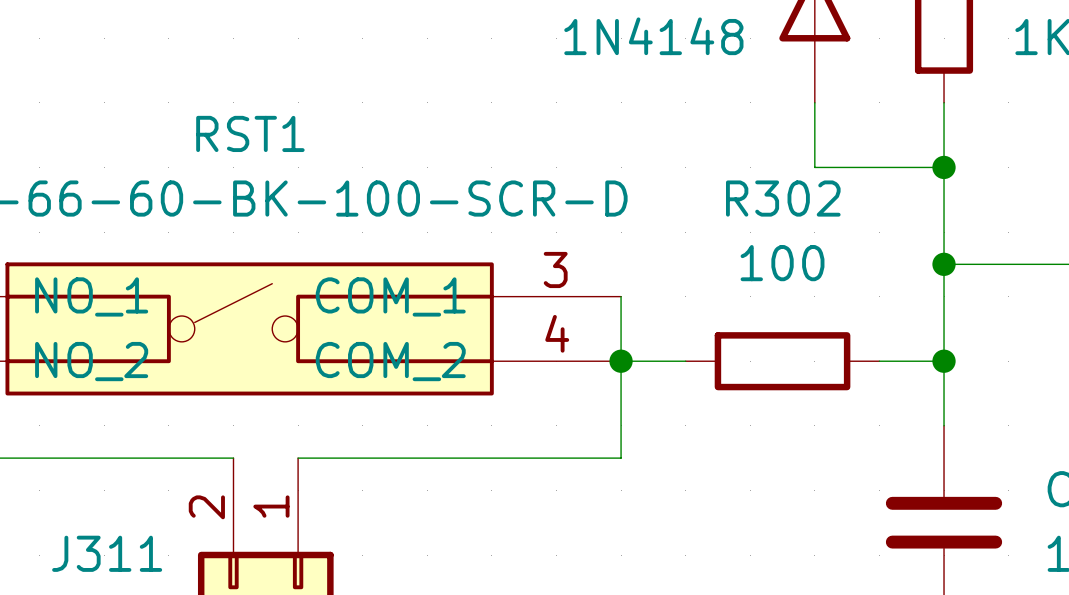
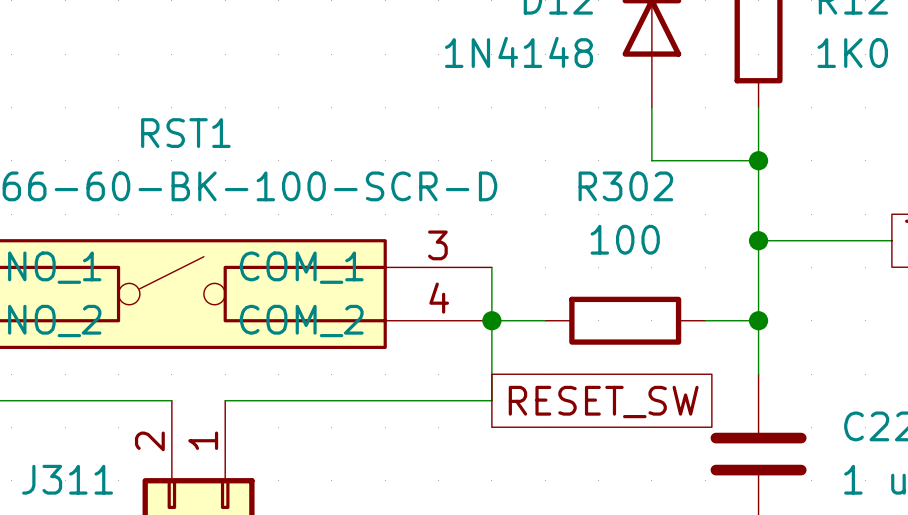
global label: none -> RESET_SW (603, 402)

